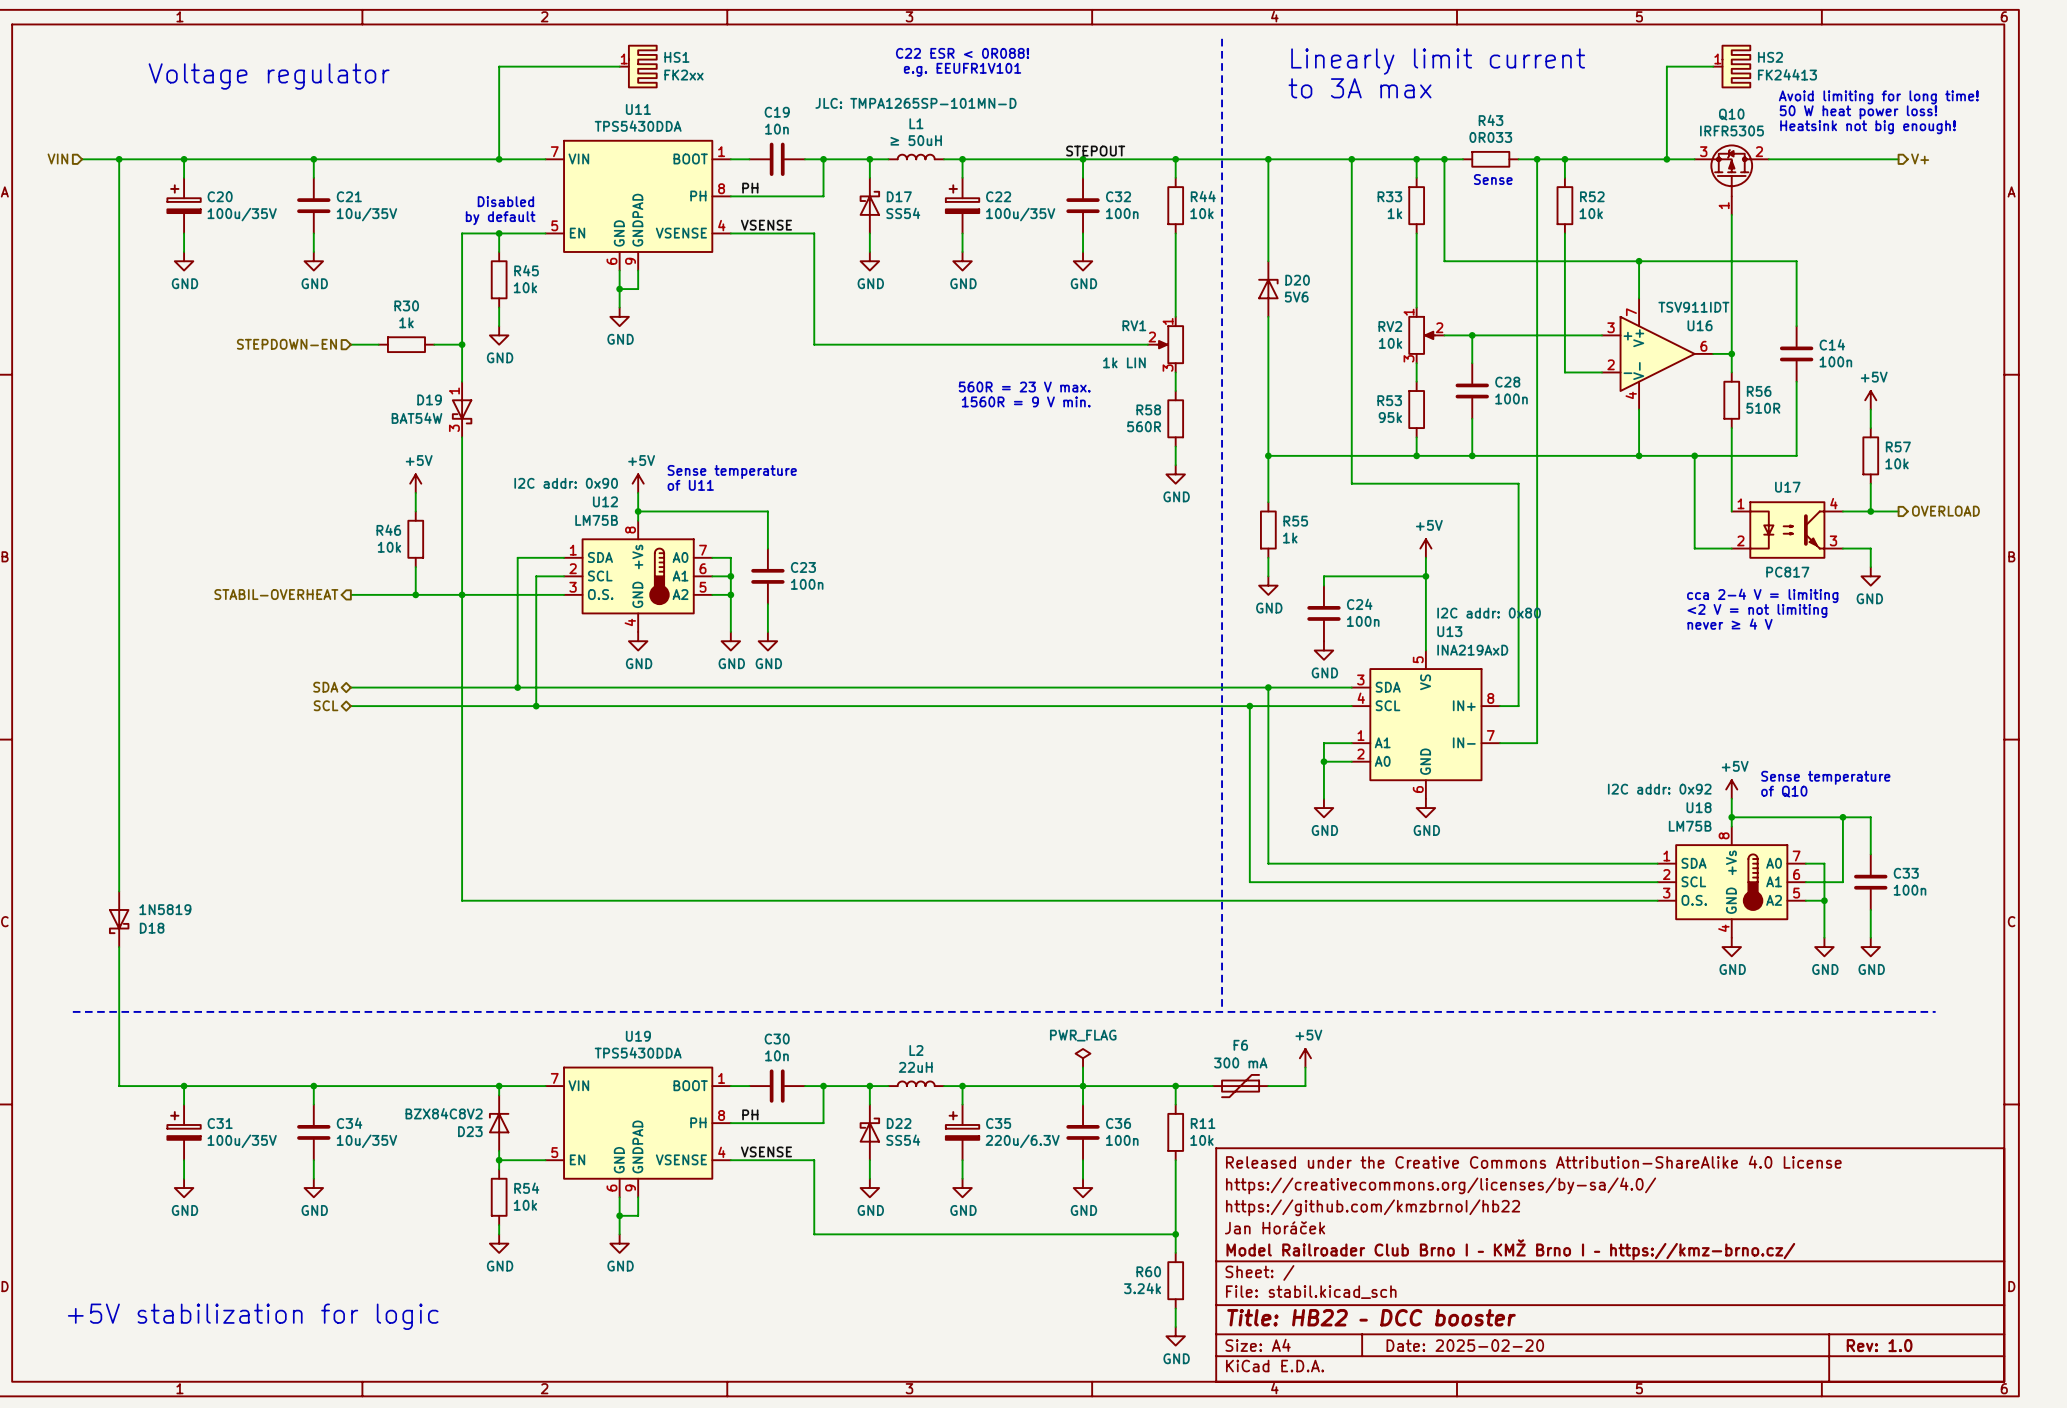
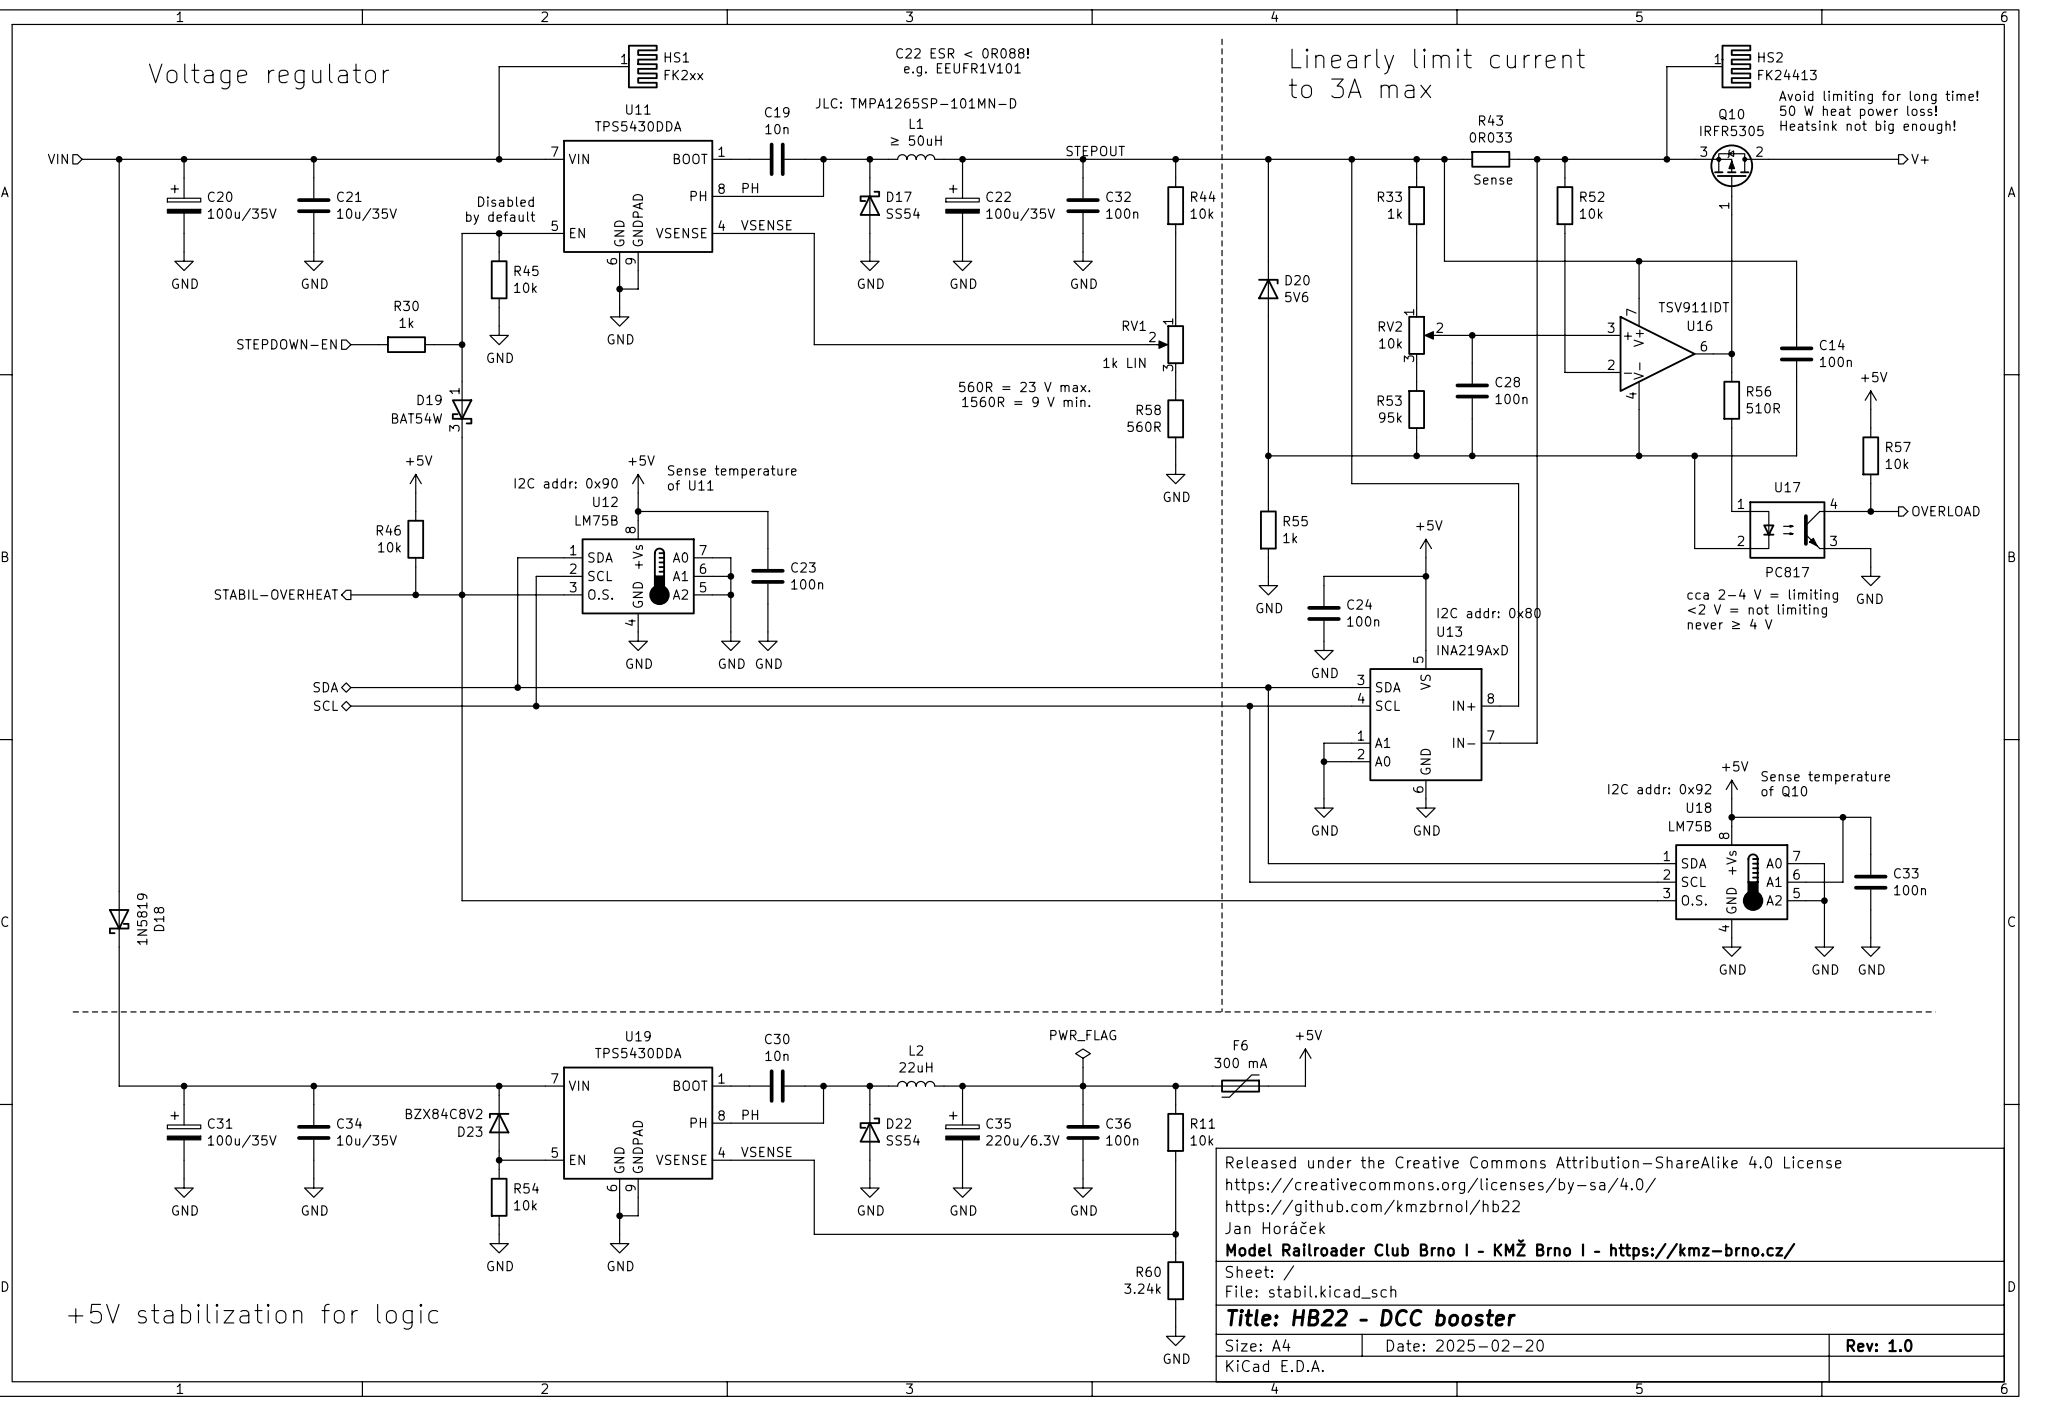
D18 value rotation: 0° (165, 909) -> 90° counterclockwise (142, 919)
D18 name rotation: 0° (152, 928) -> 90° counterclockwise (159, 919)

